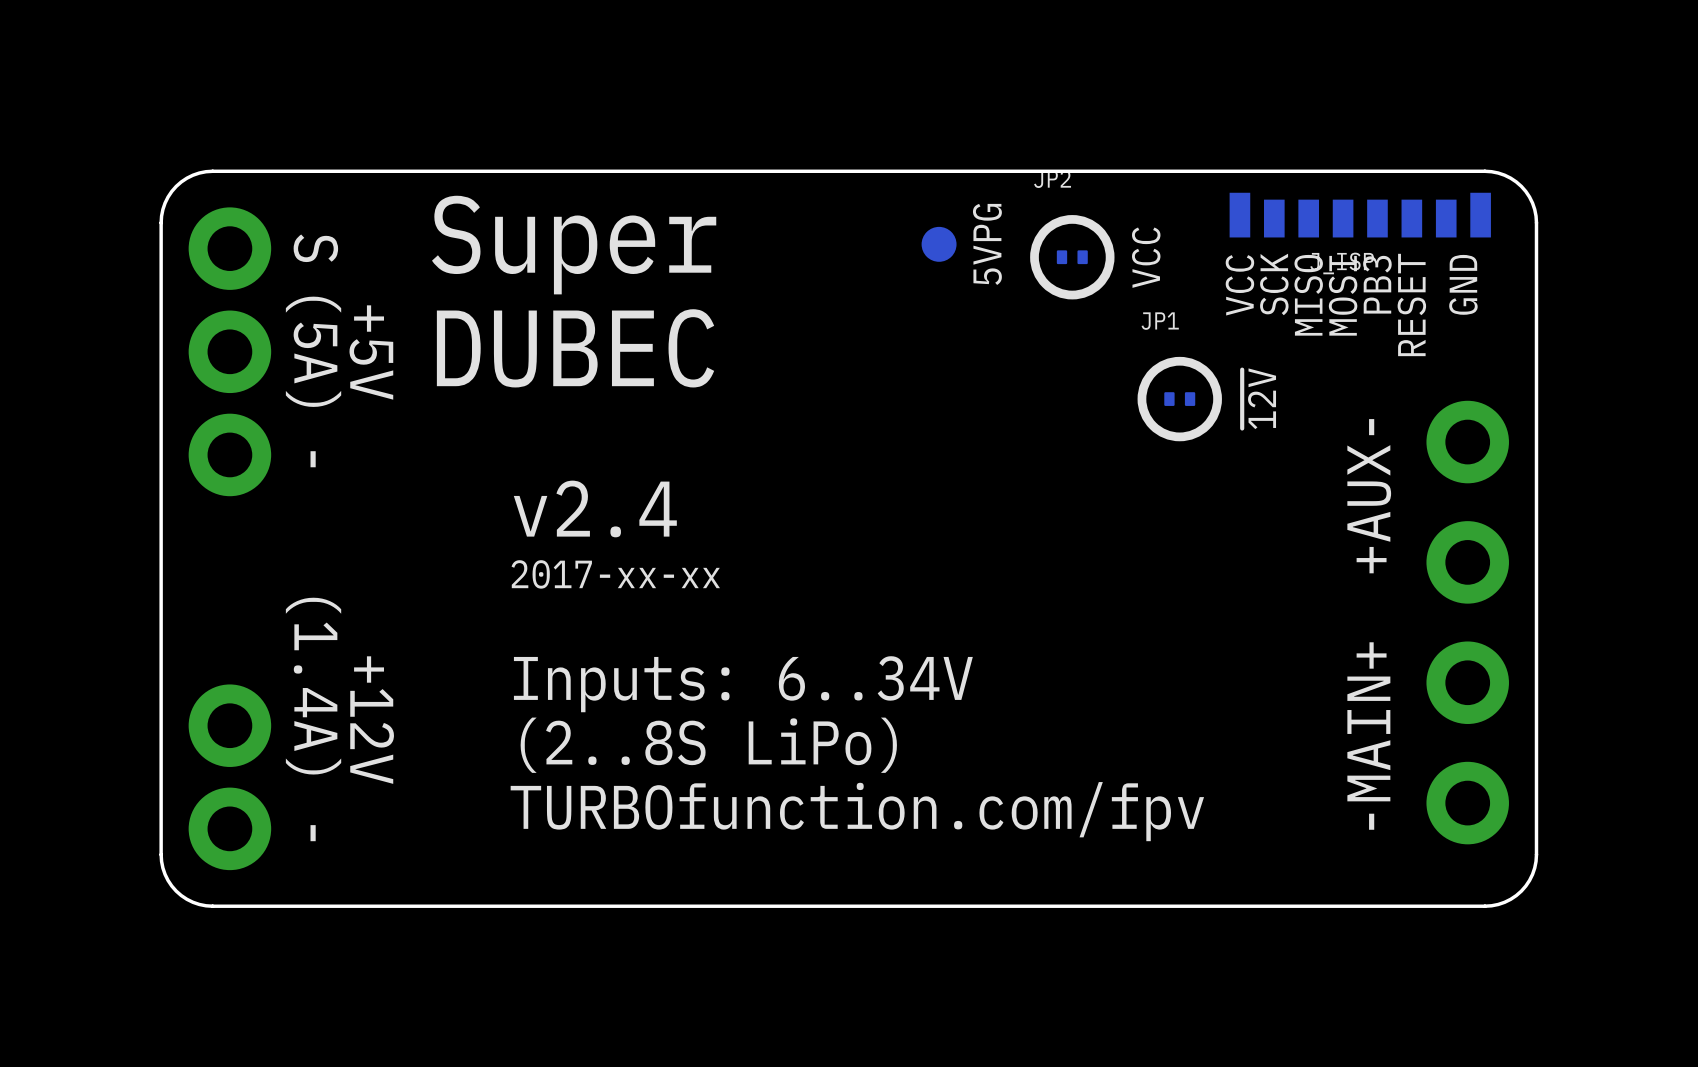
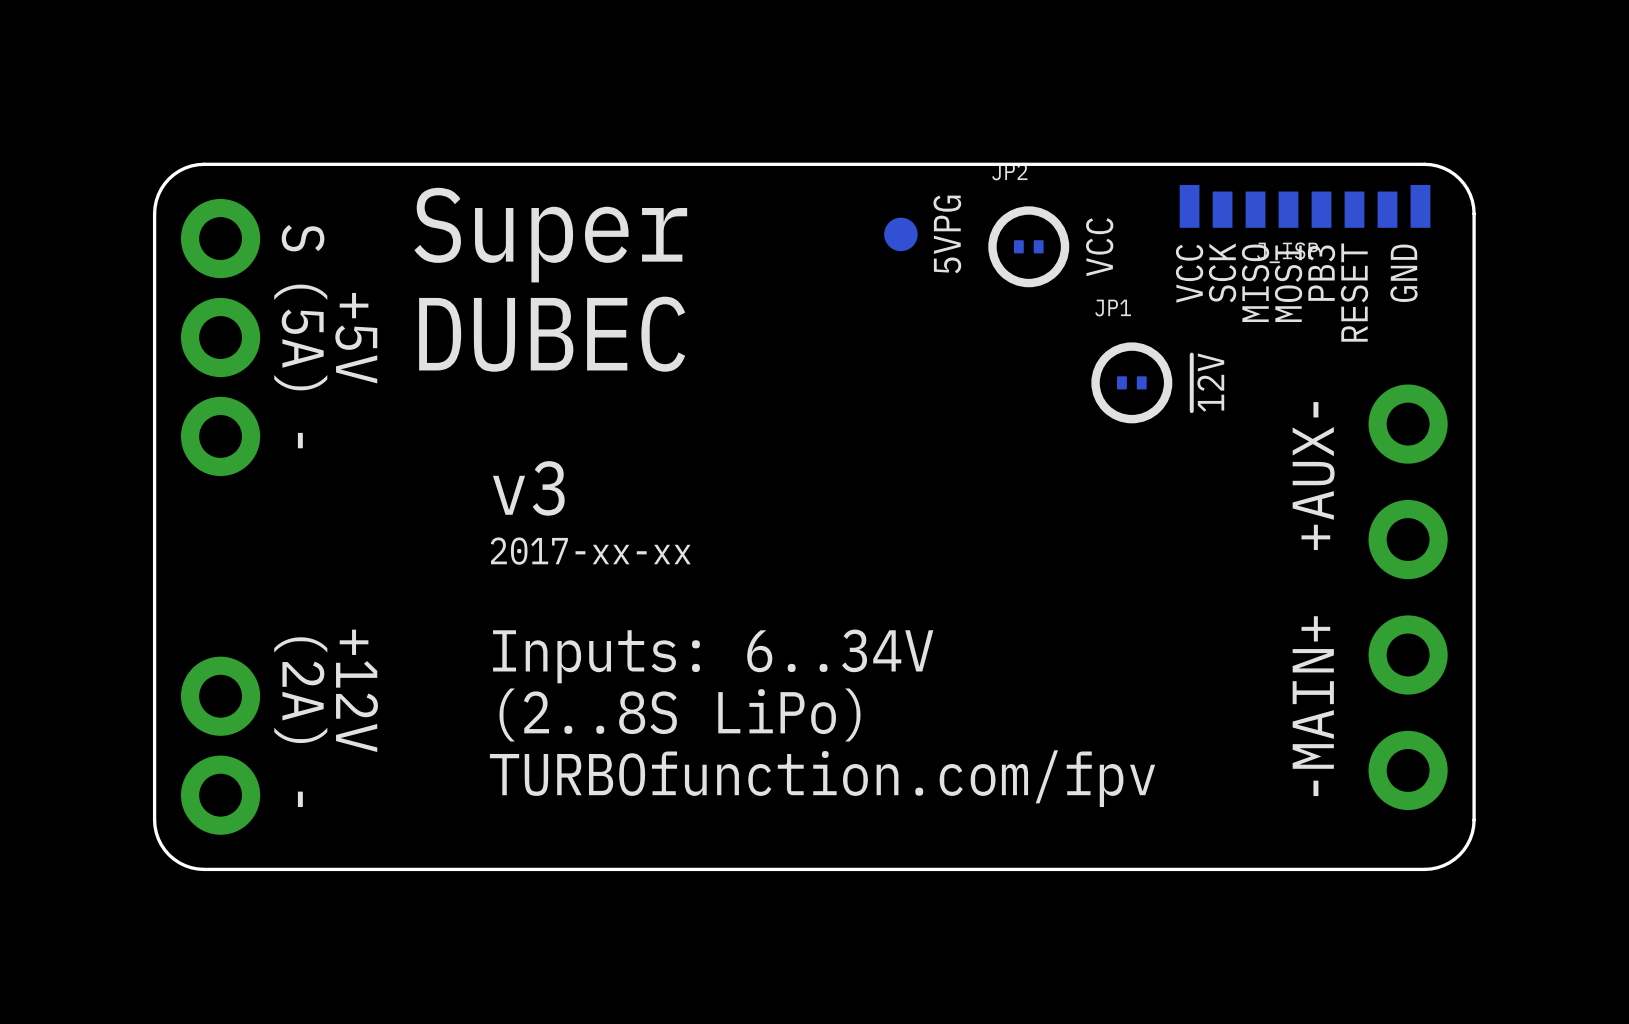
text: v2.4 (595, 508) -> v3 (528, 488)
text: (1.4A) (313, 686) -> (2A) (300, 690)

